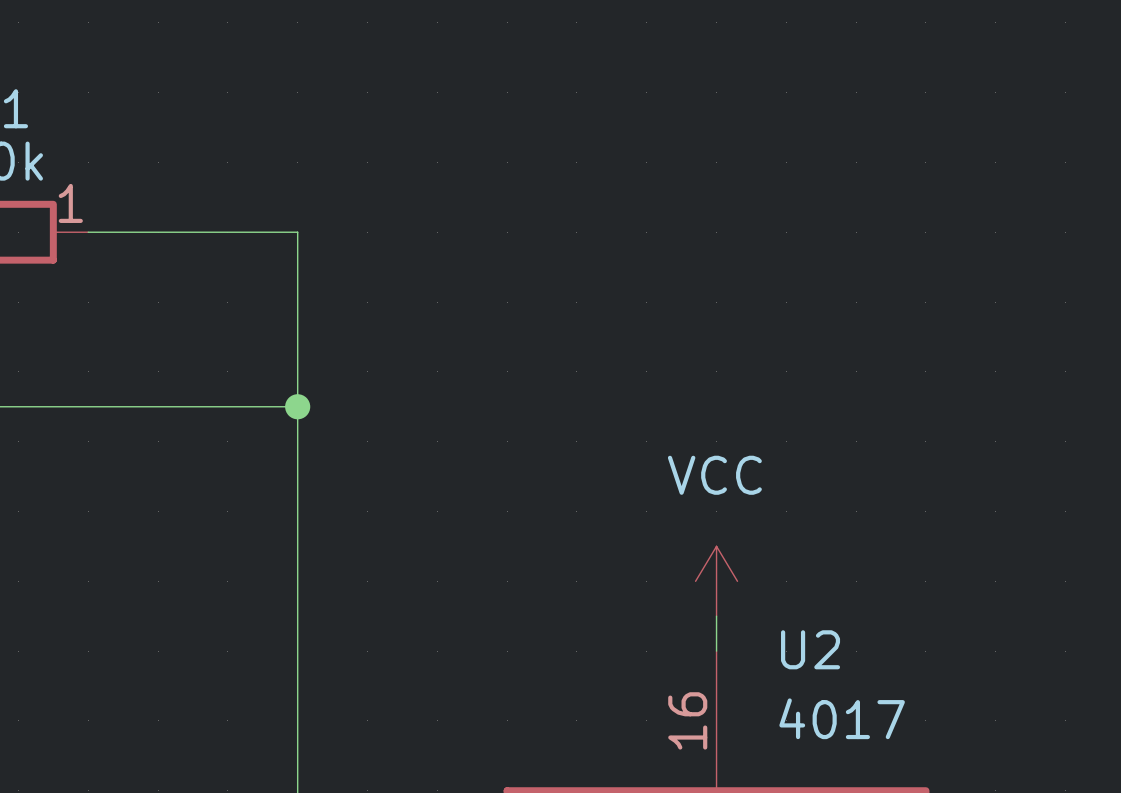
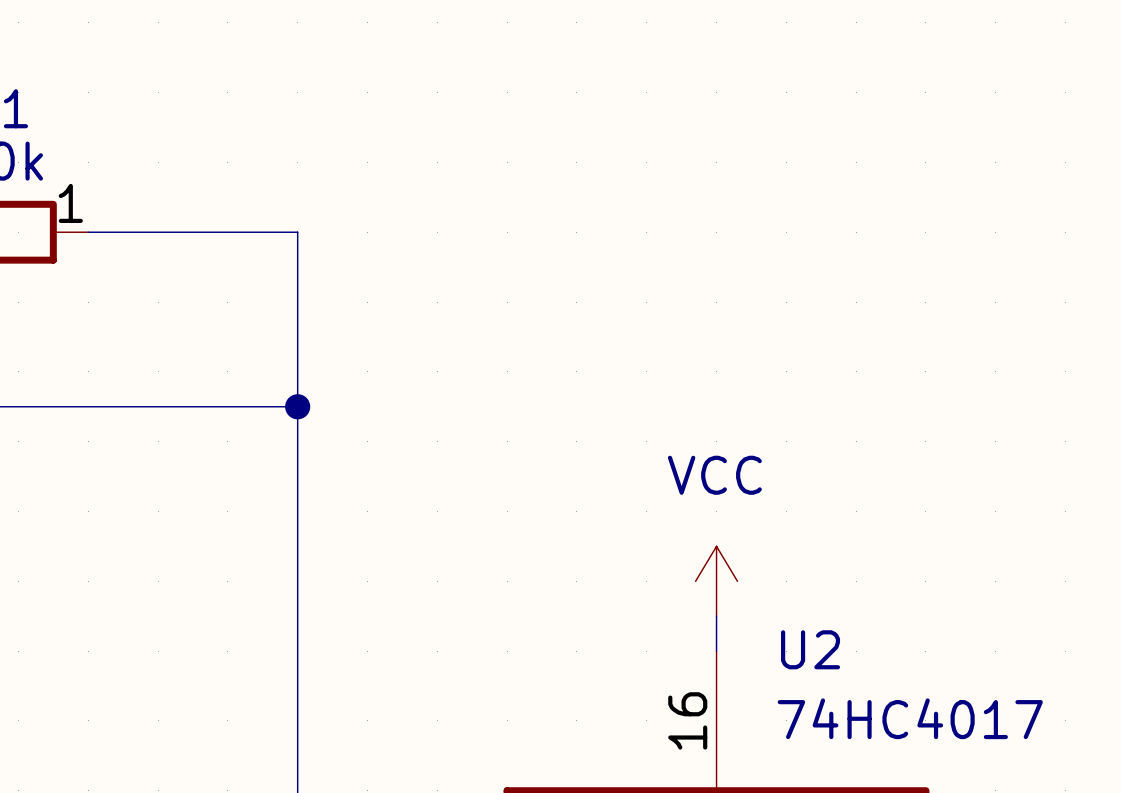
U2 value: 4017 (842, 718) -> 74HC4017 (910, 718)

